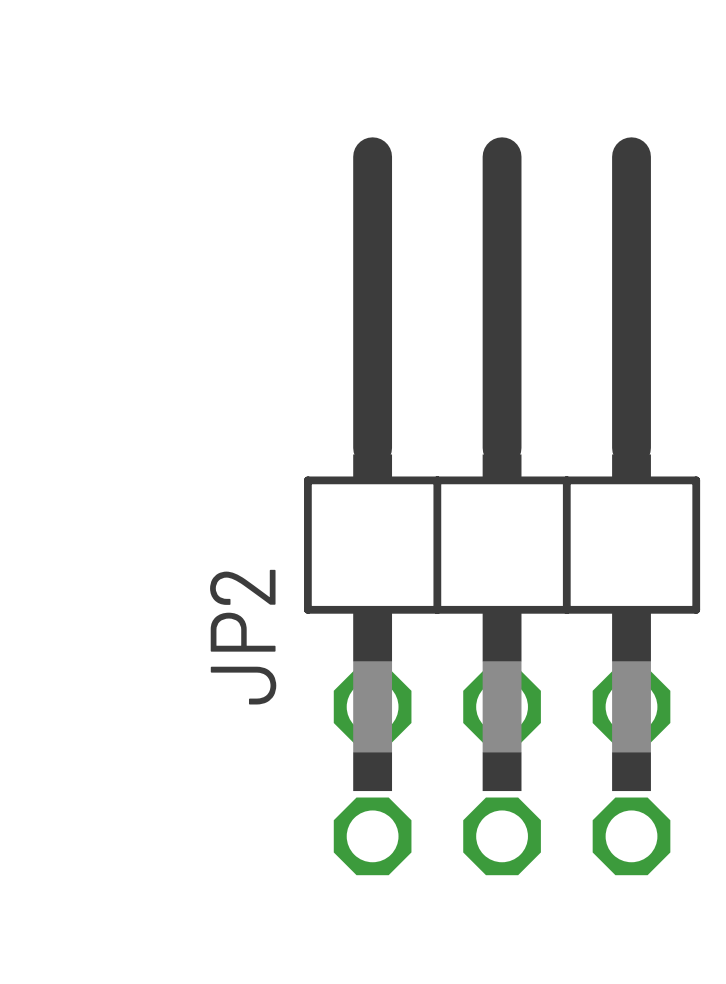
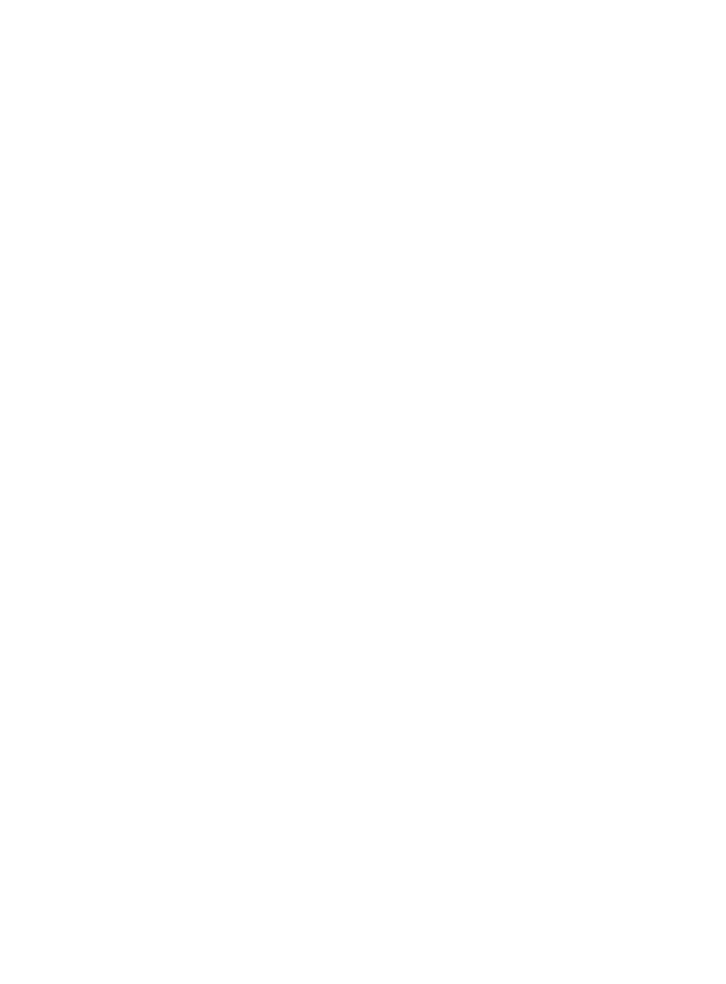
JP2: (502, 506) -> none

